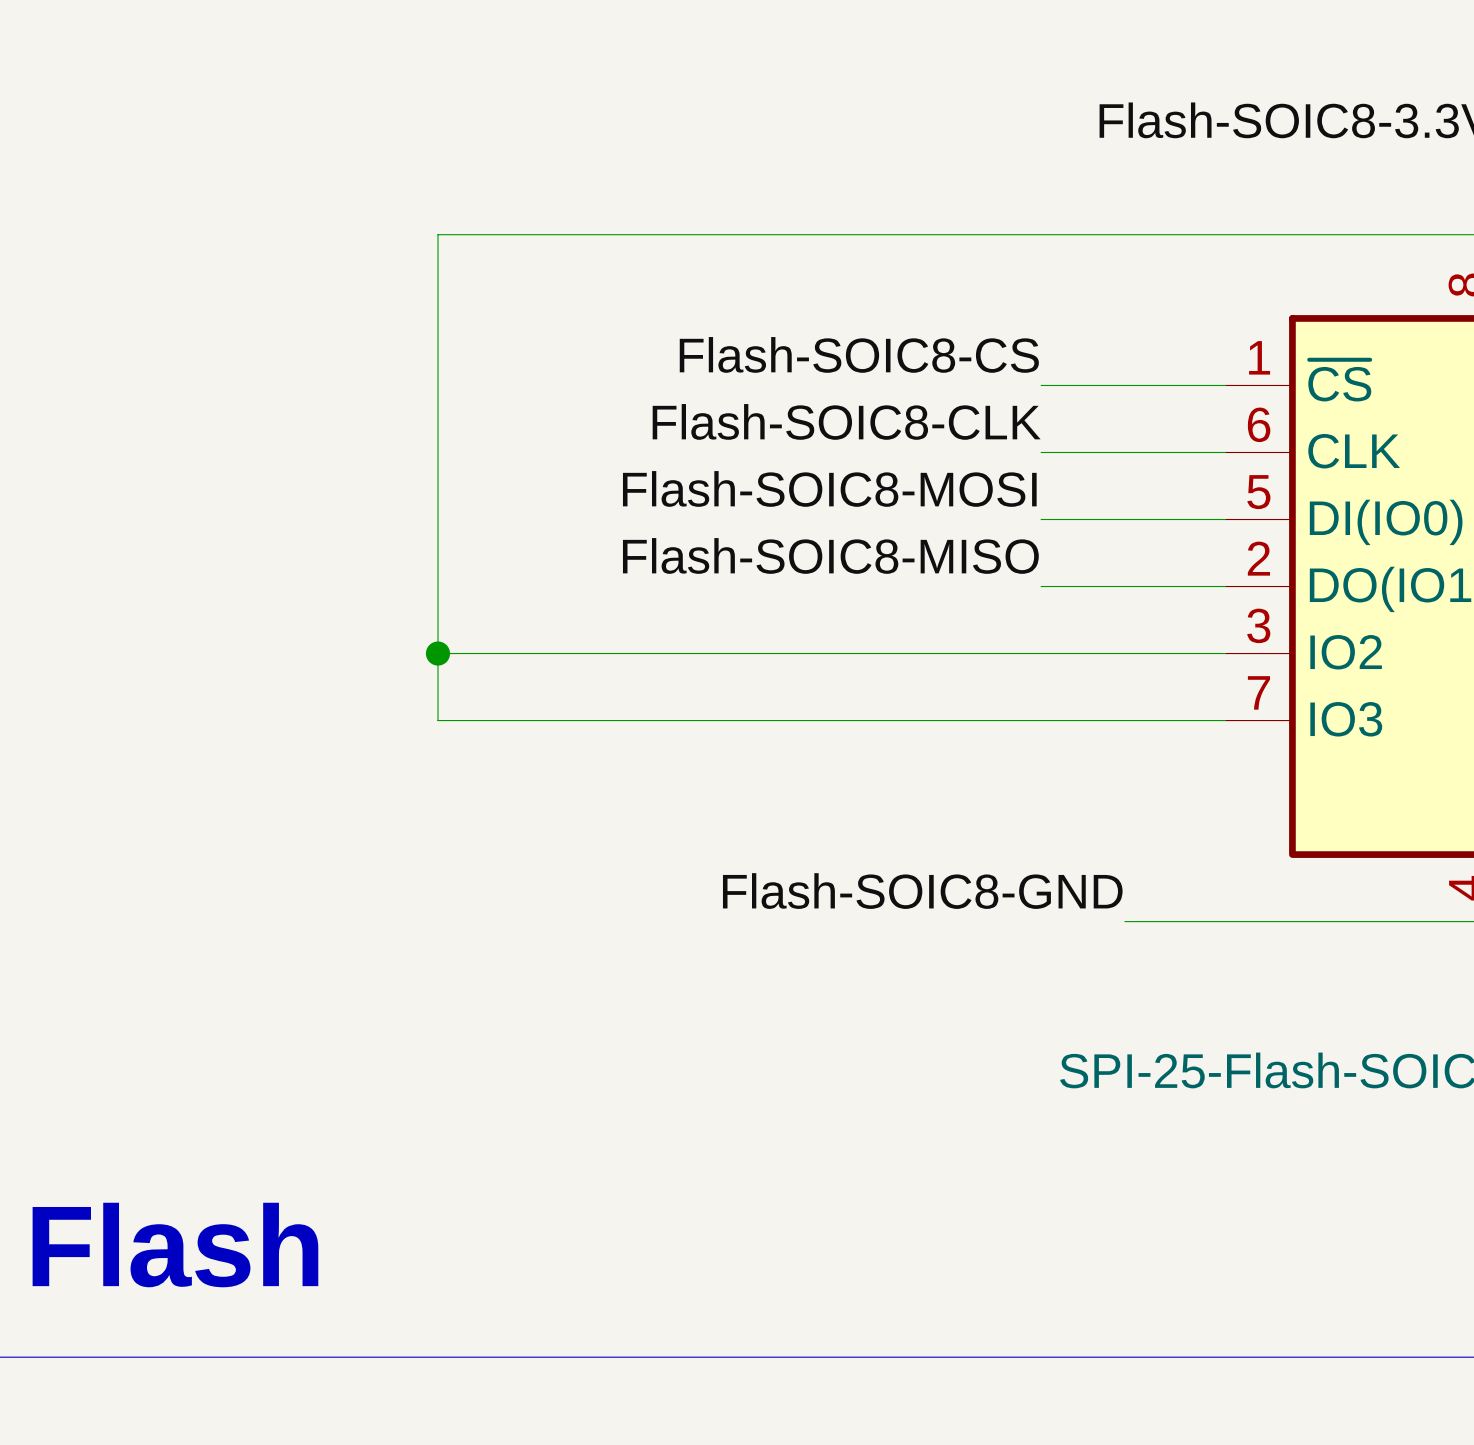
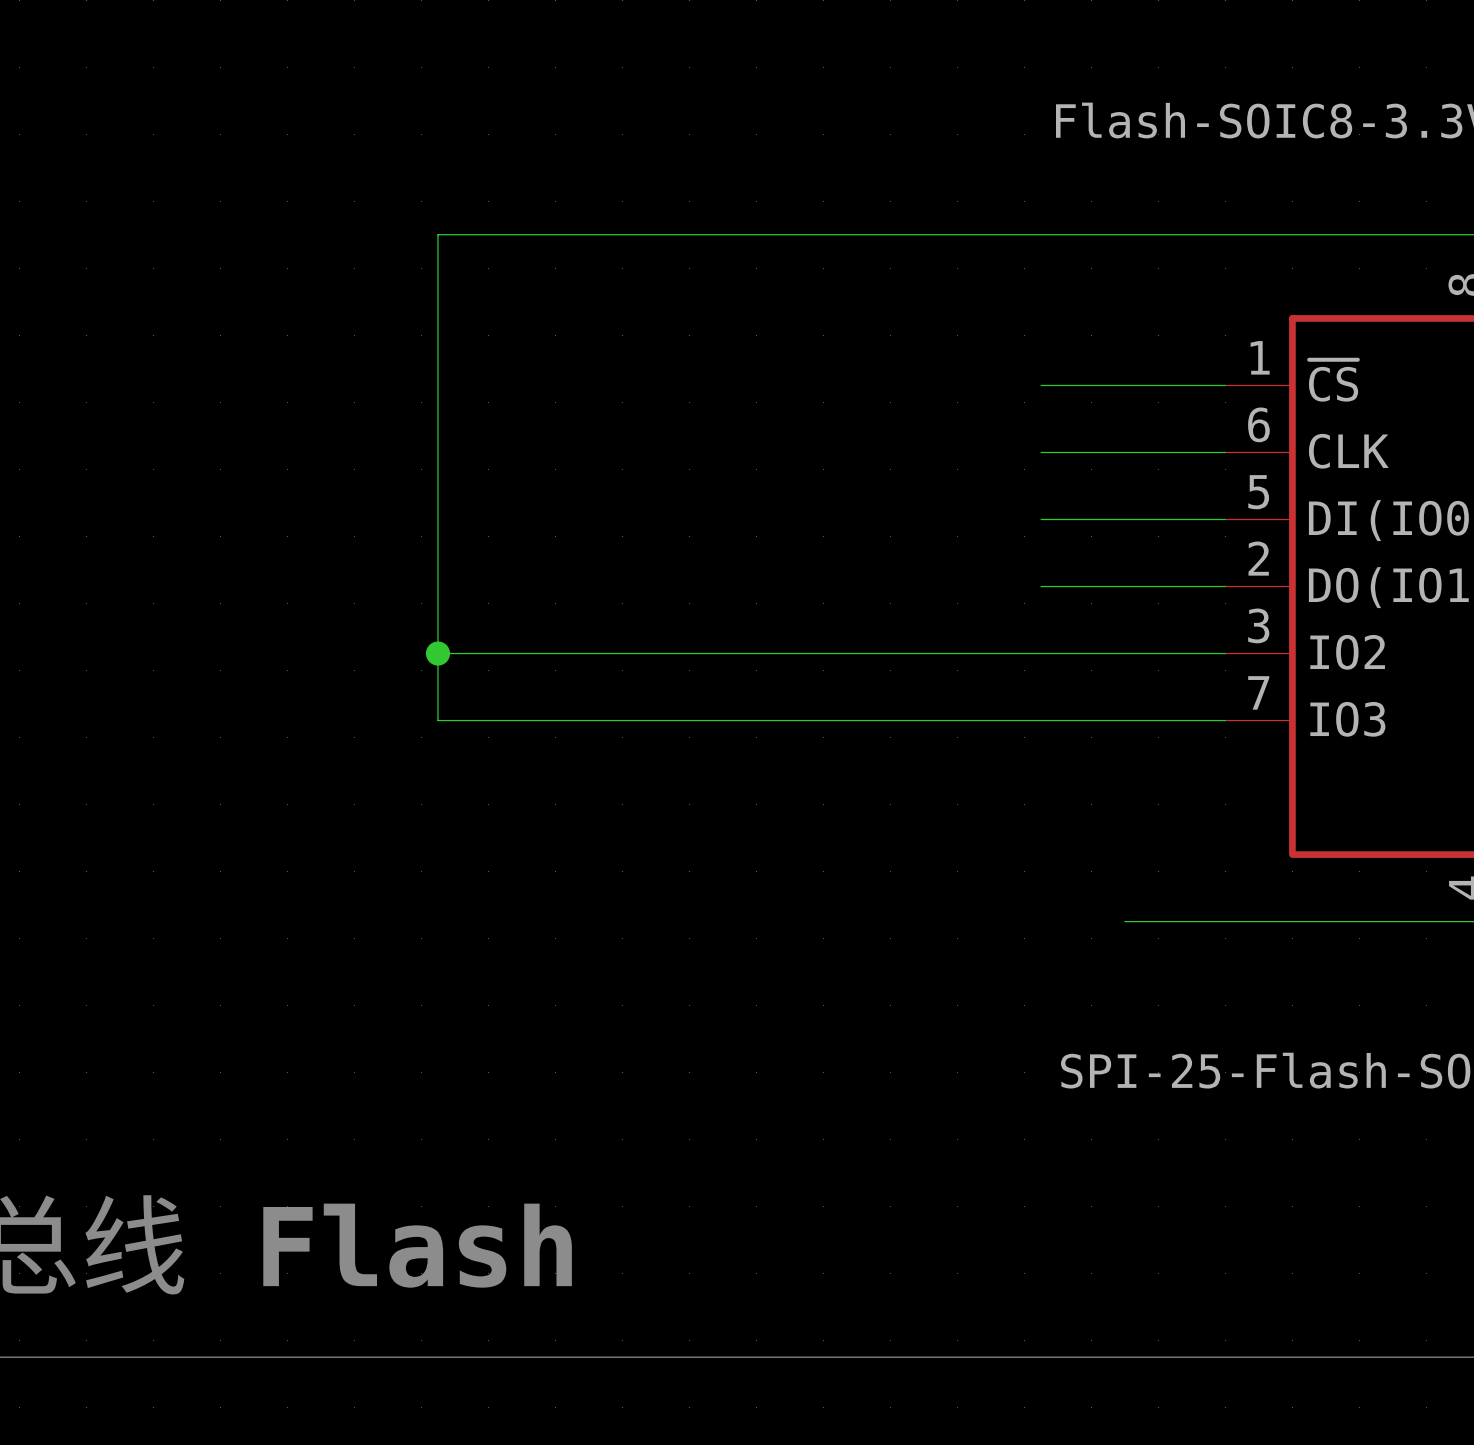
label: Flash-SOIC8-CS (859, 354) -> none
label: Flash-SOIC8-CLK (846, 421) -> none
label: Flash-SOIC8-MOSI (829, 488) -> none
label: Flash-SOIC8-MISO (830, 555) -> none
label: Flash-SOIC8-GND (922, 891) -> none

